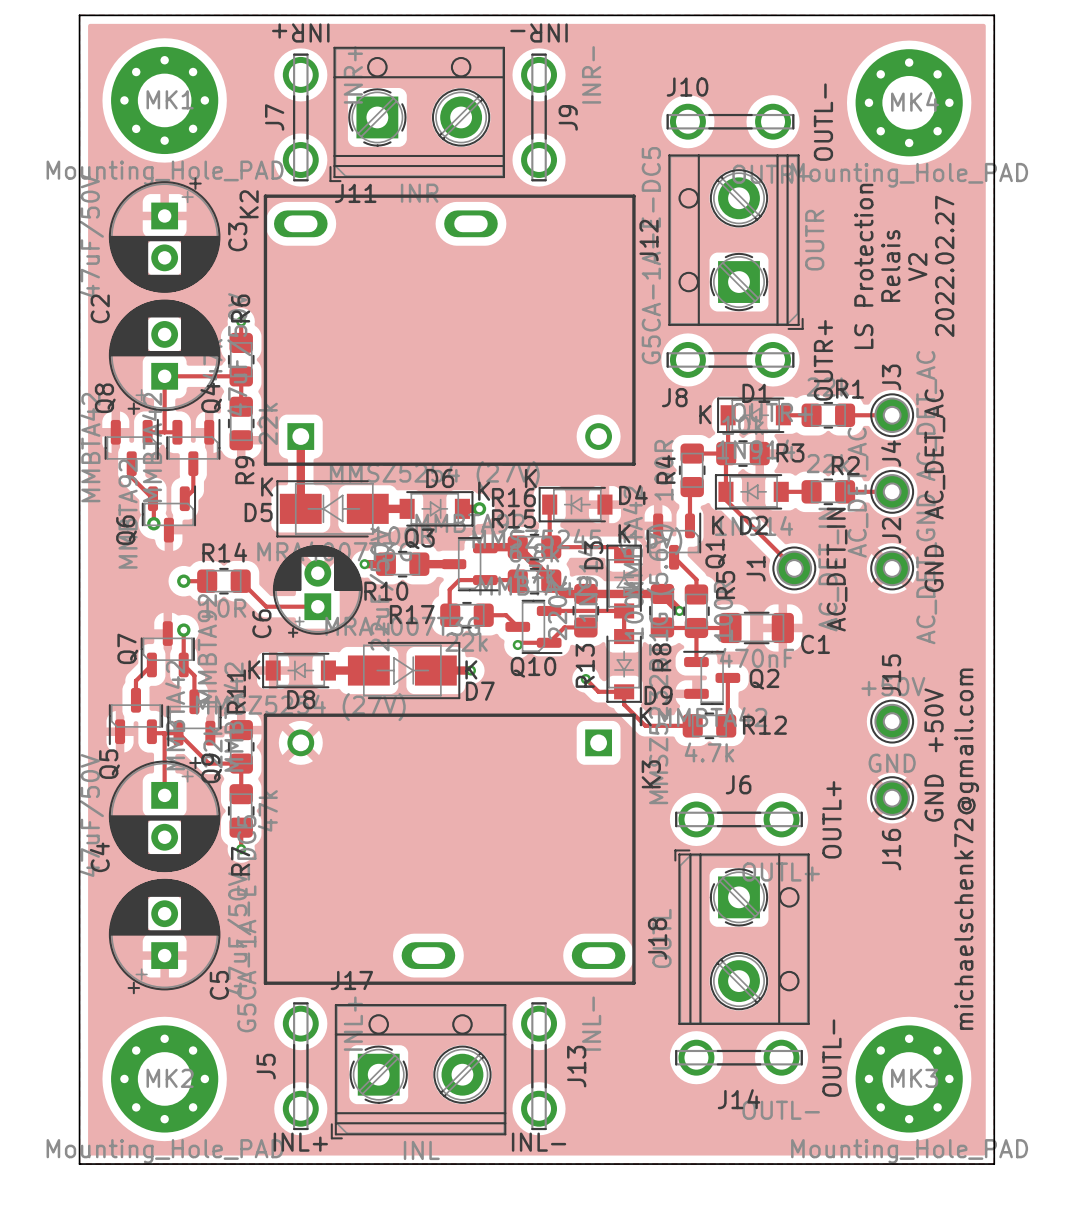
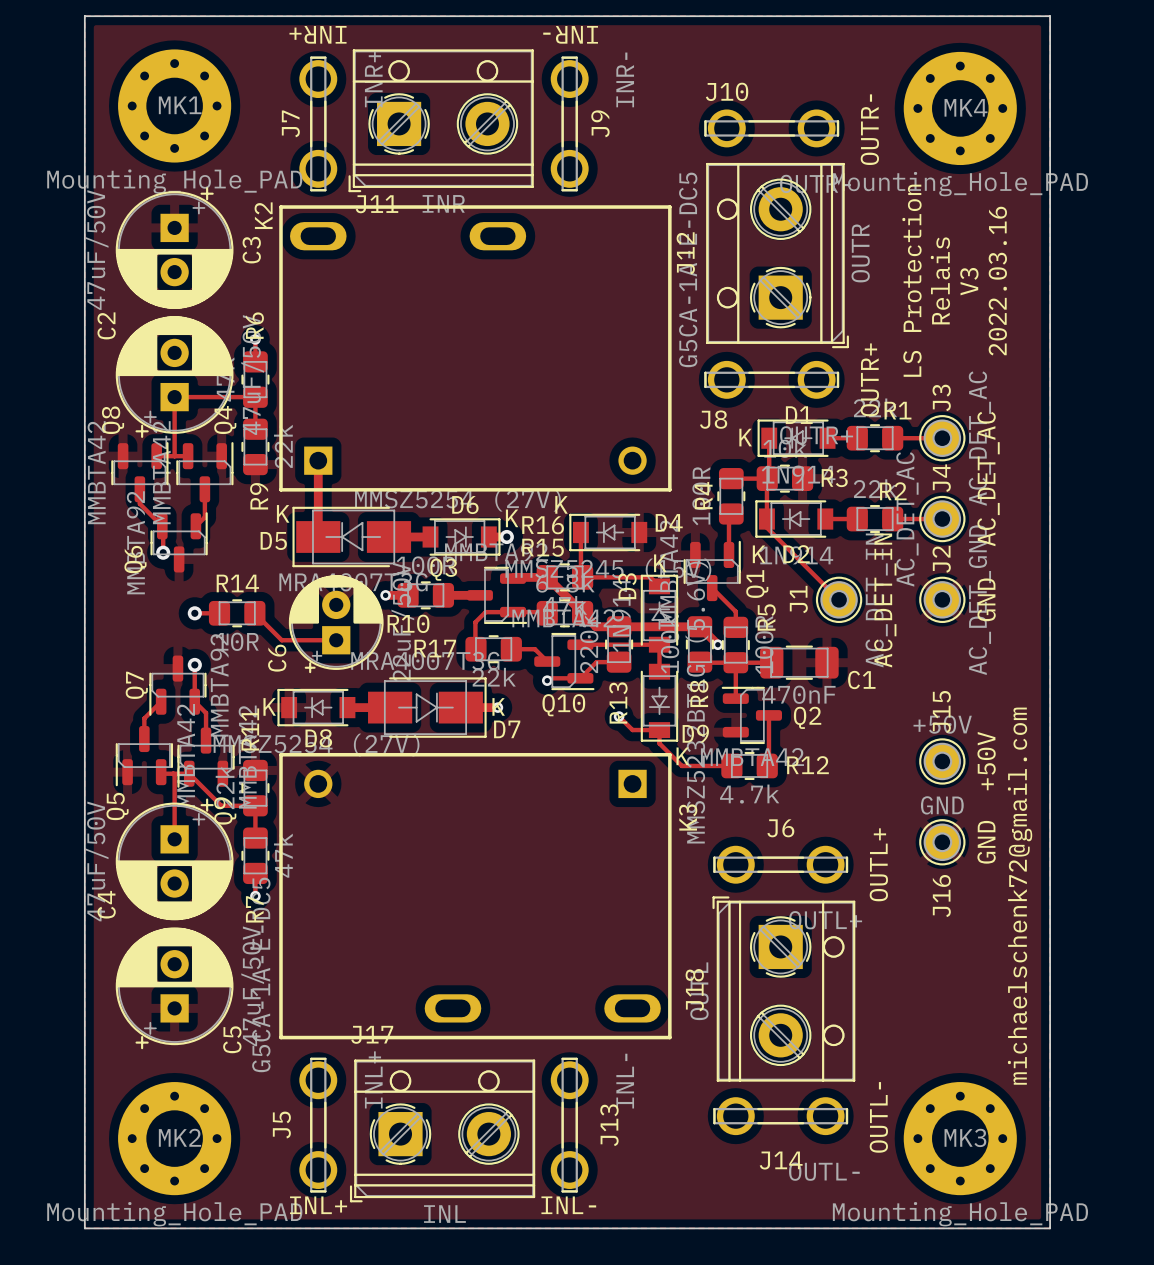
text: OUTL- (823, 122) -> OUTR- (869, 129)
text: 2022.02.27 (944, 266) -> 2022.03.16 (997, 281)
text: V2 (917, 267) -> V3 (969, 281)

